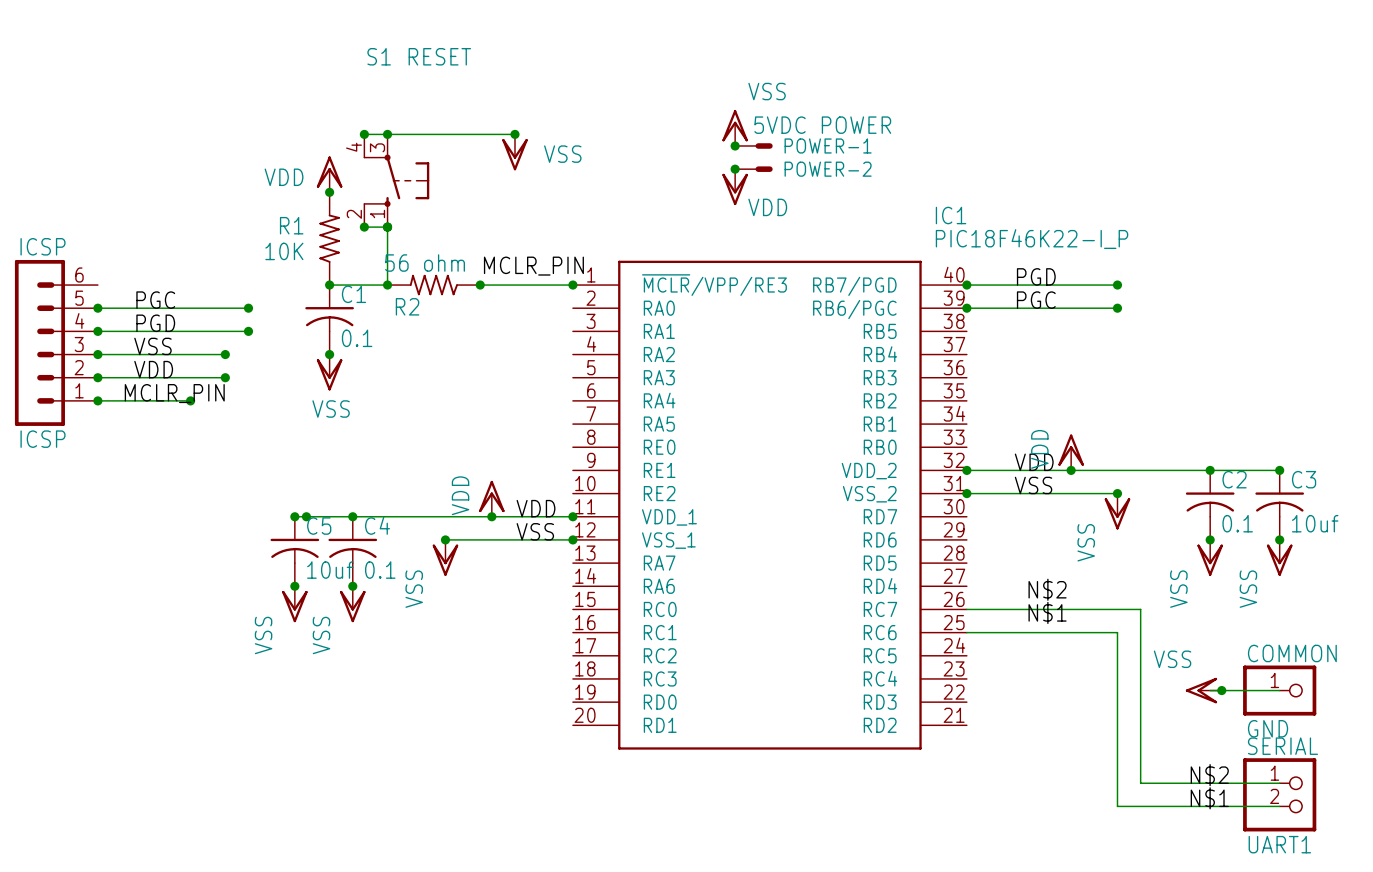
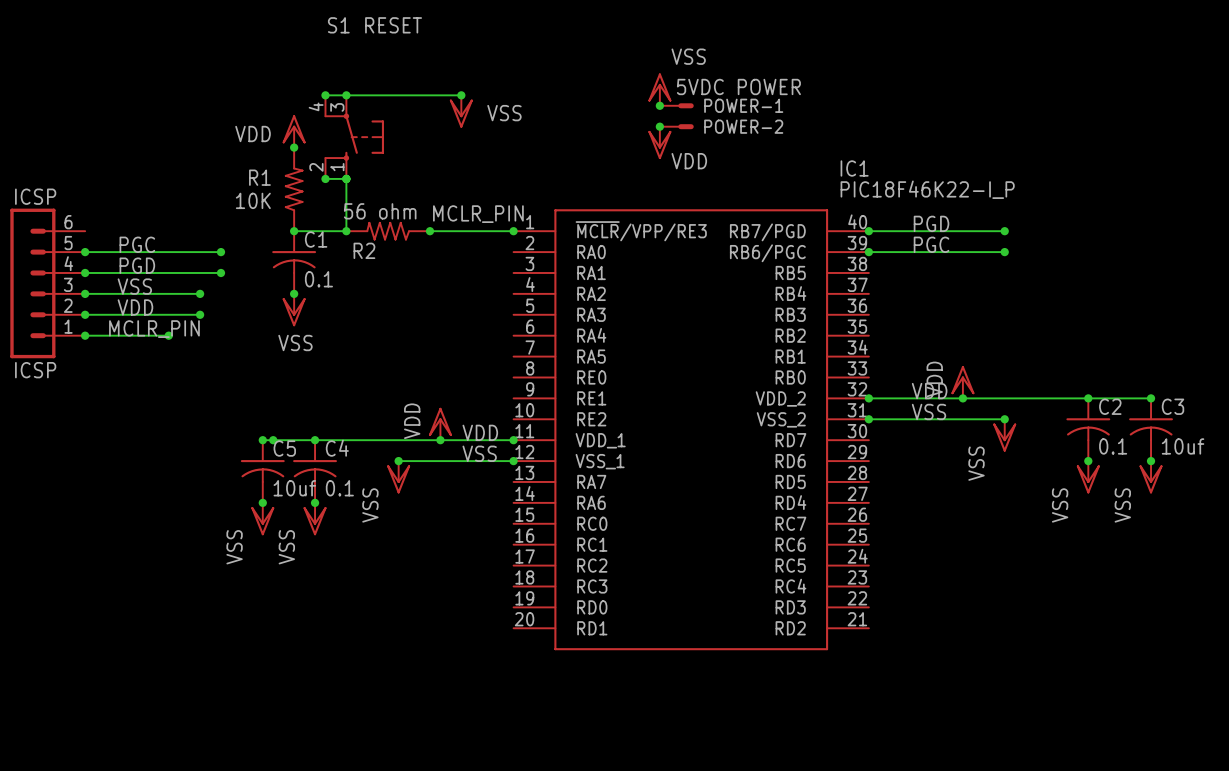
label: N$2 (1047, 589) -> none
wire: (966, 609) (1140, 609) (1140, 783) (1279, 783) -> none
label: N$1 (1047, 612) -> none
wire: (966, 632) (1117, 632) (1117, 806) (1279, 806) -> none
power symbol: VSS (1203, 690) -> none
wire: (1210, 690) (1279, 690) -> none
junction: (1221, 690) -> none
COMMON: GND (1279, 690) -> none
label: N$2 (1209, 775) -> none
SERIAL: UART1 (1279, 794) -> none
label: N$1 (1209, 798) -> none

